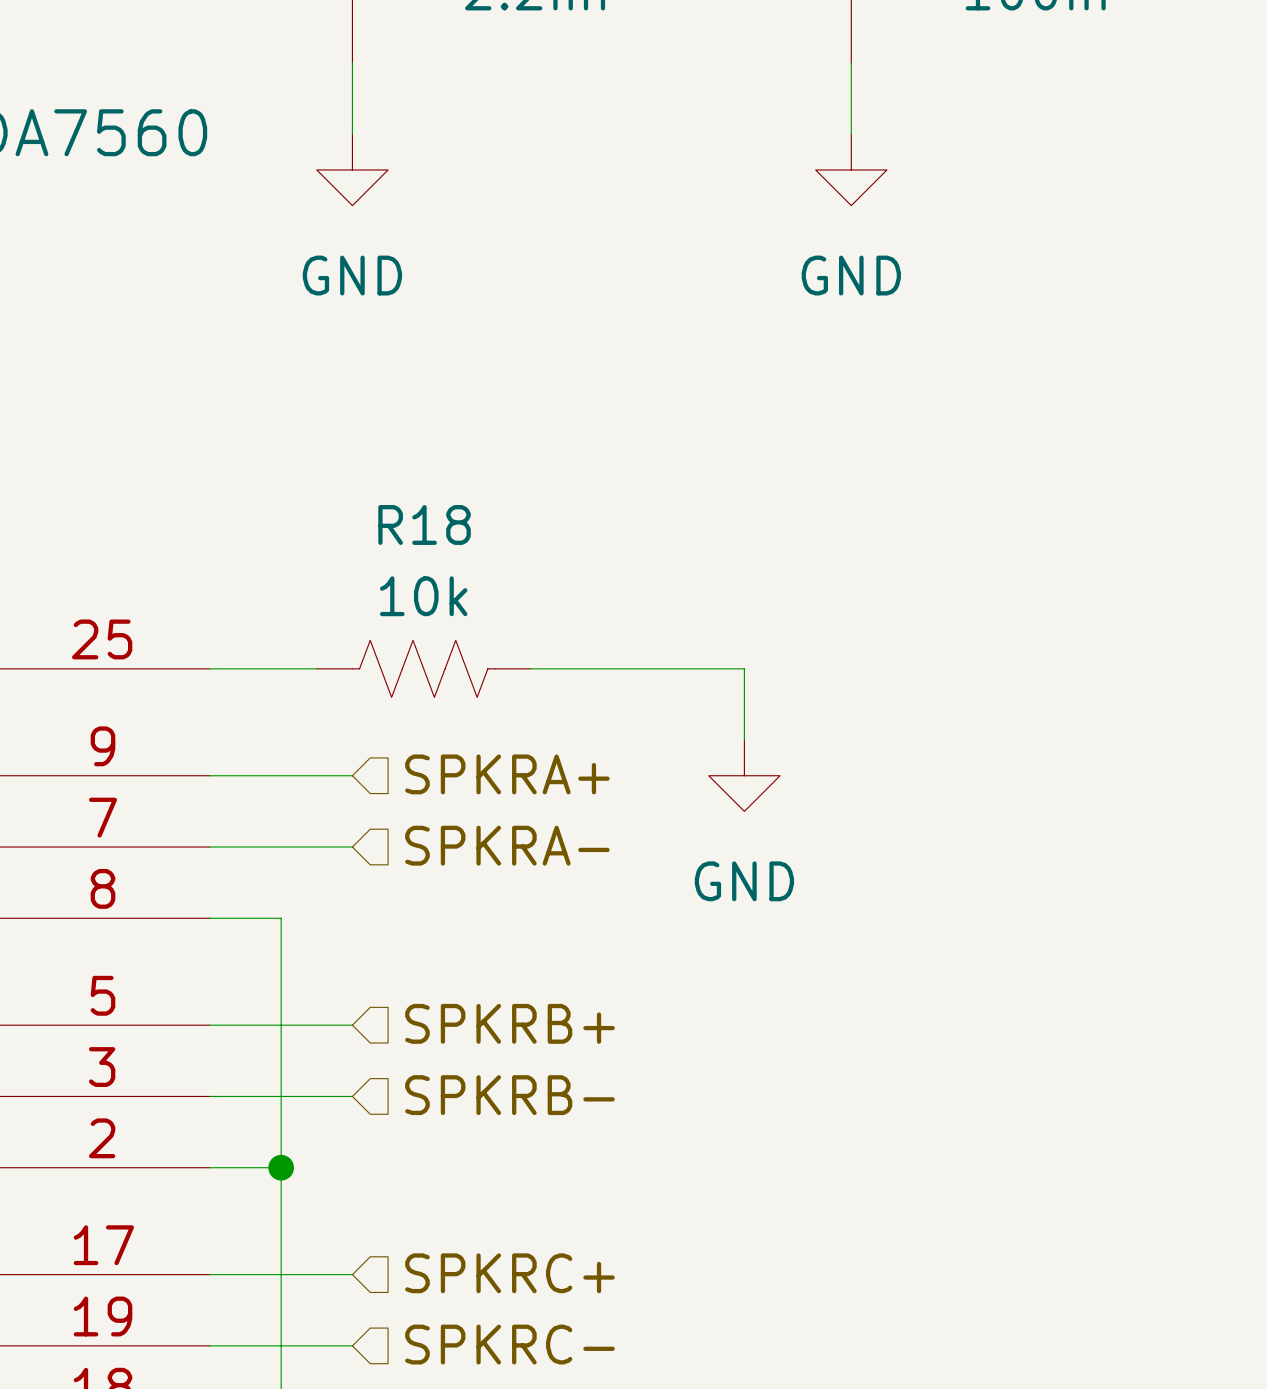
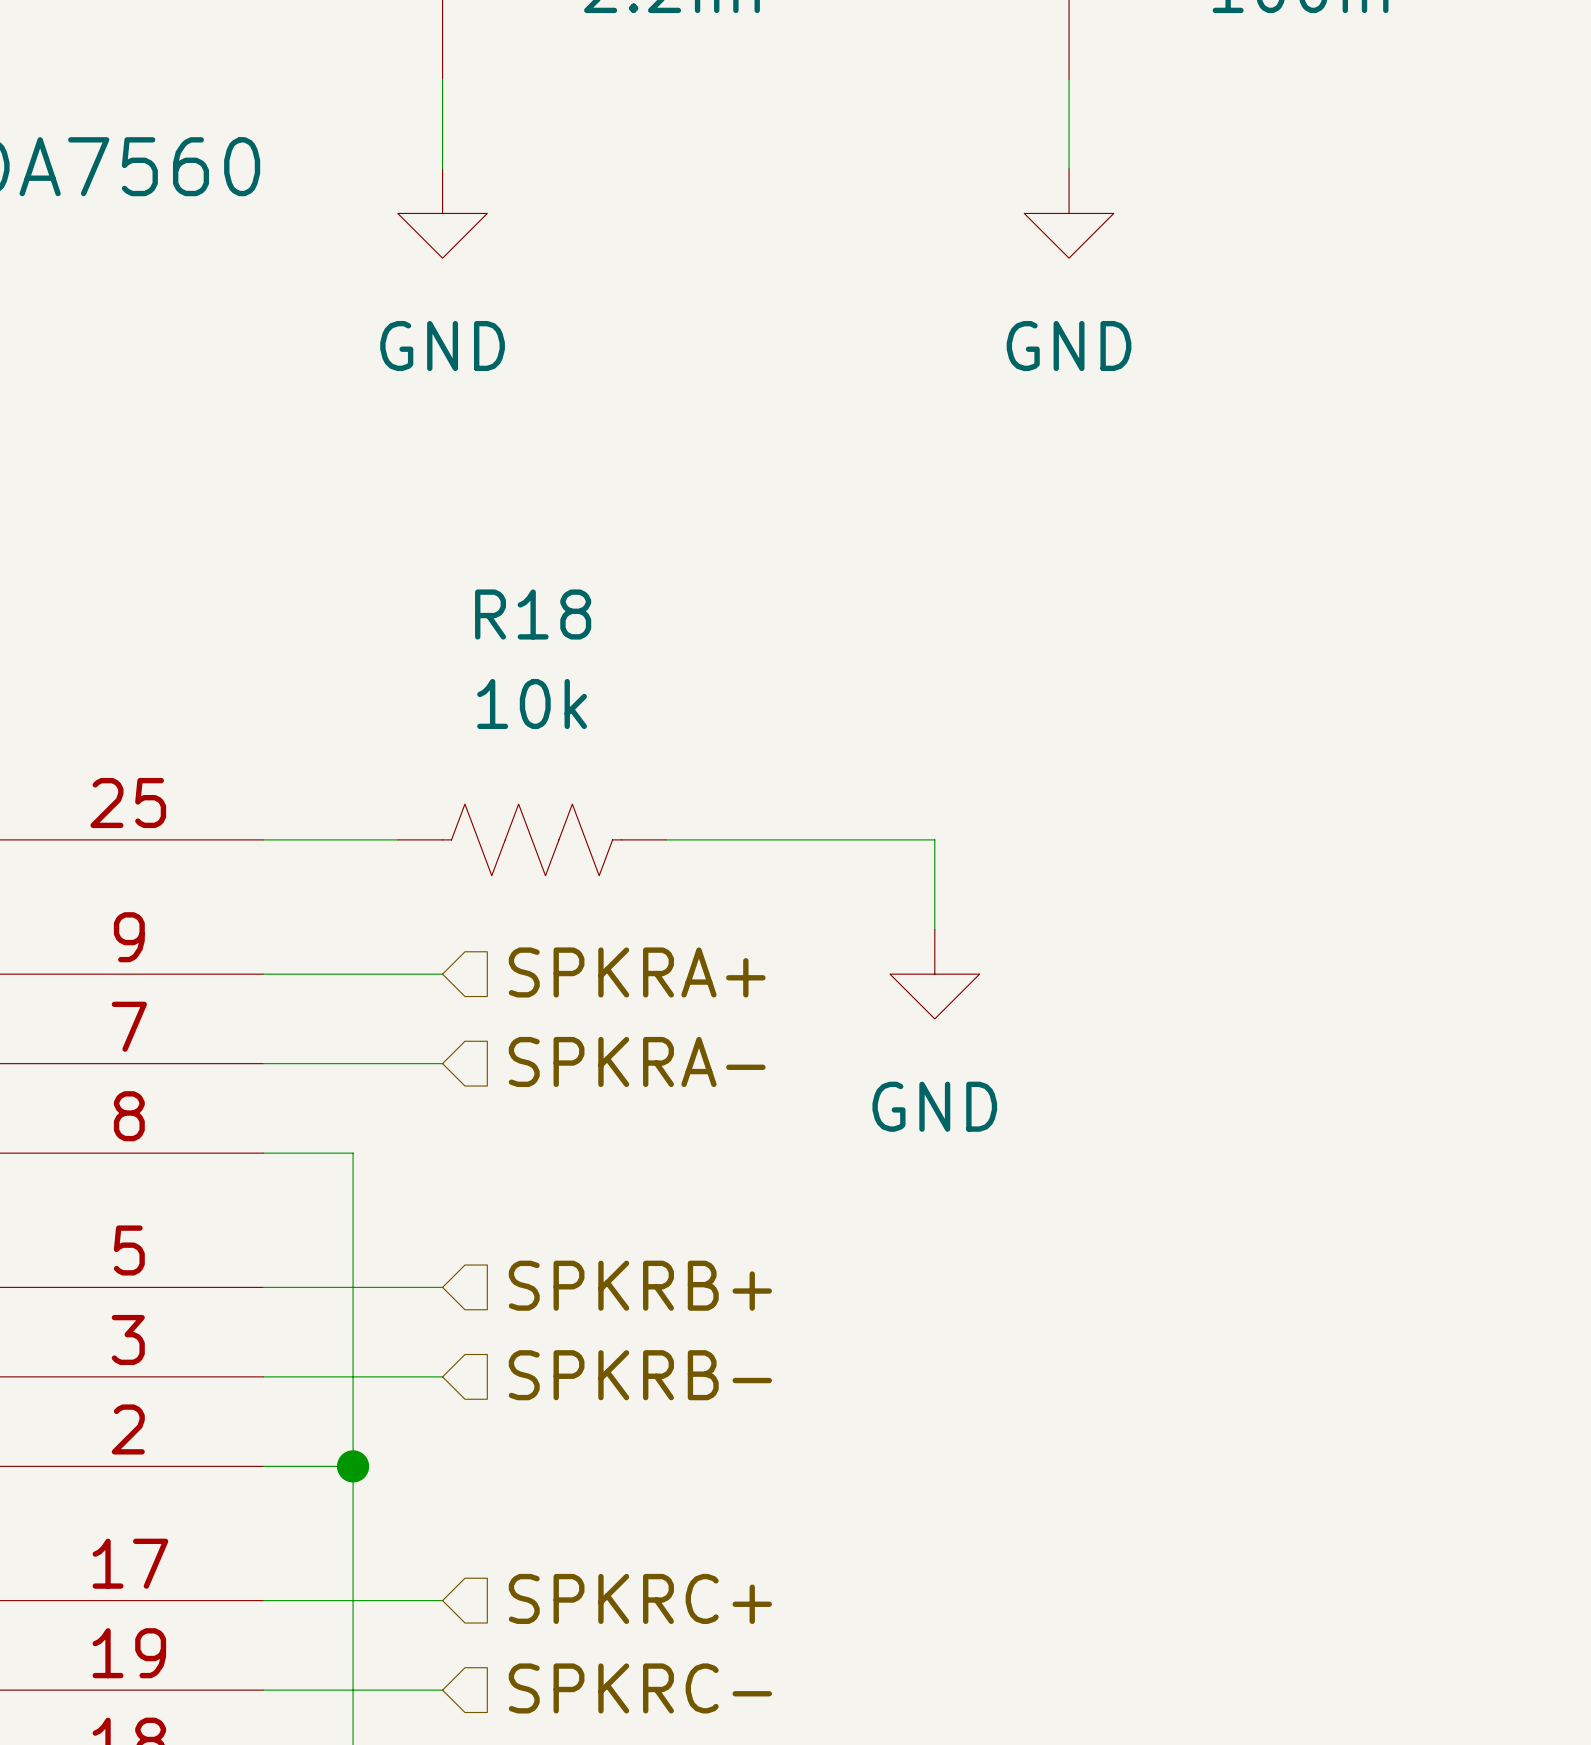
R18 name position: R18 (424, 524) -> R18 (533, 614)
R18 value position: 10k (423, 596) -> 10k (532, 704)

